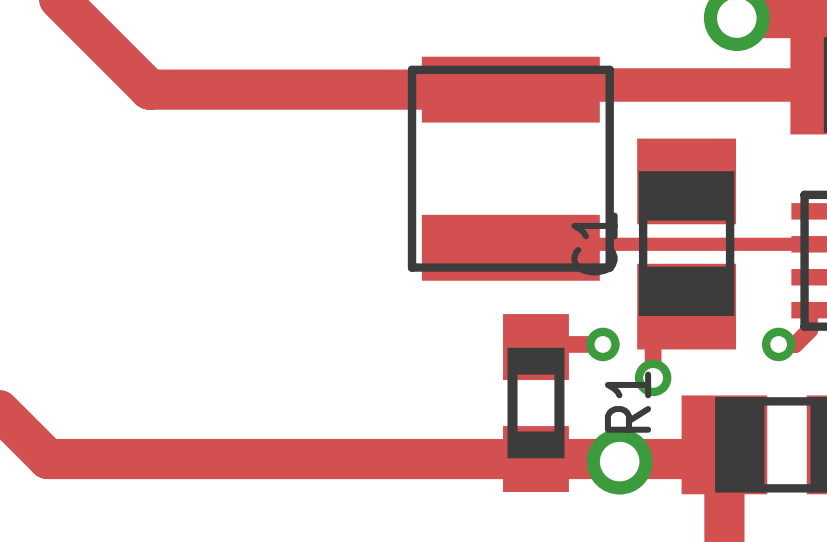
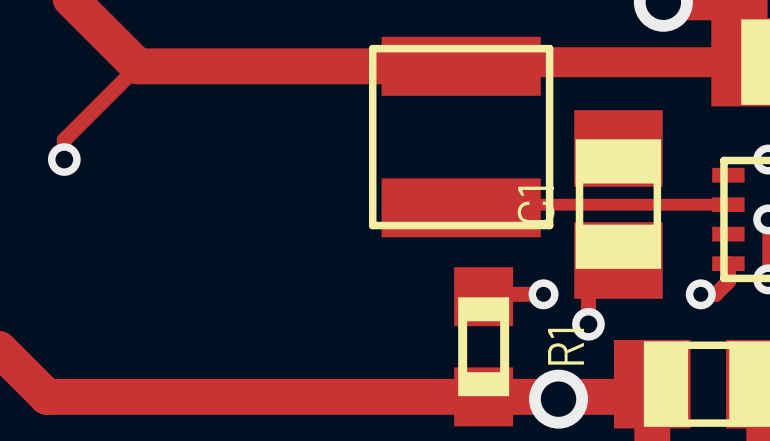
track: none -> (137, 66) (64, 139) (64, 159)
via: none -> (64, 159)

